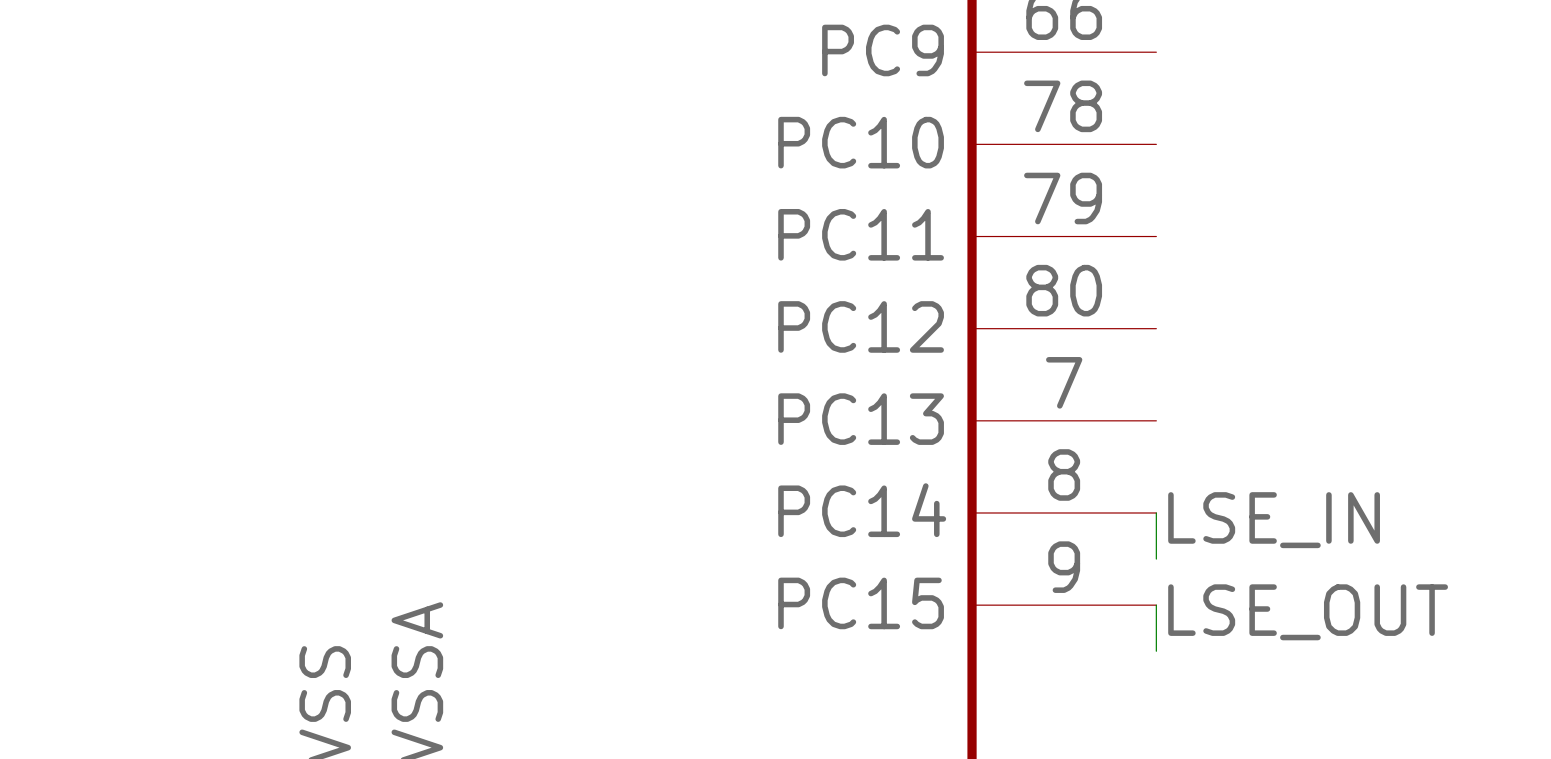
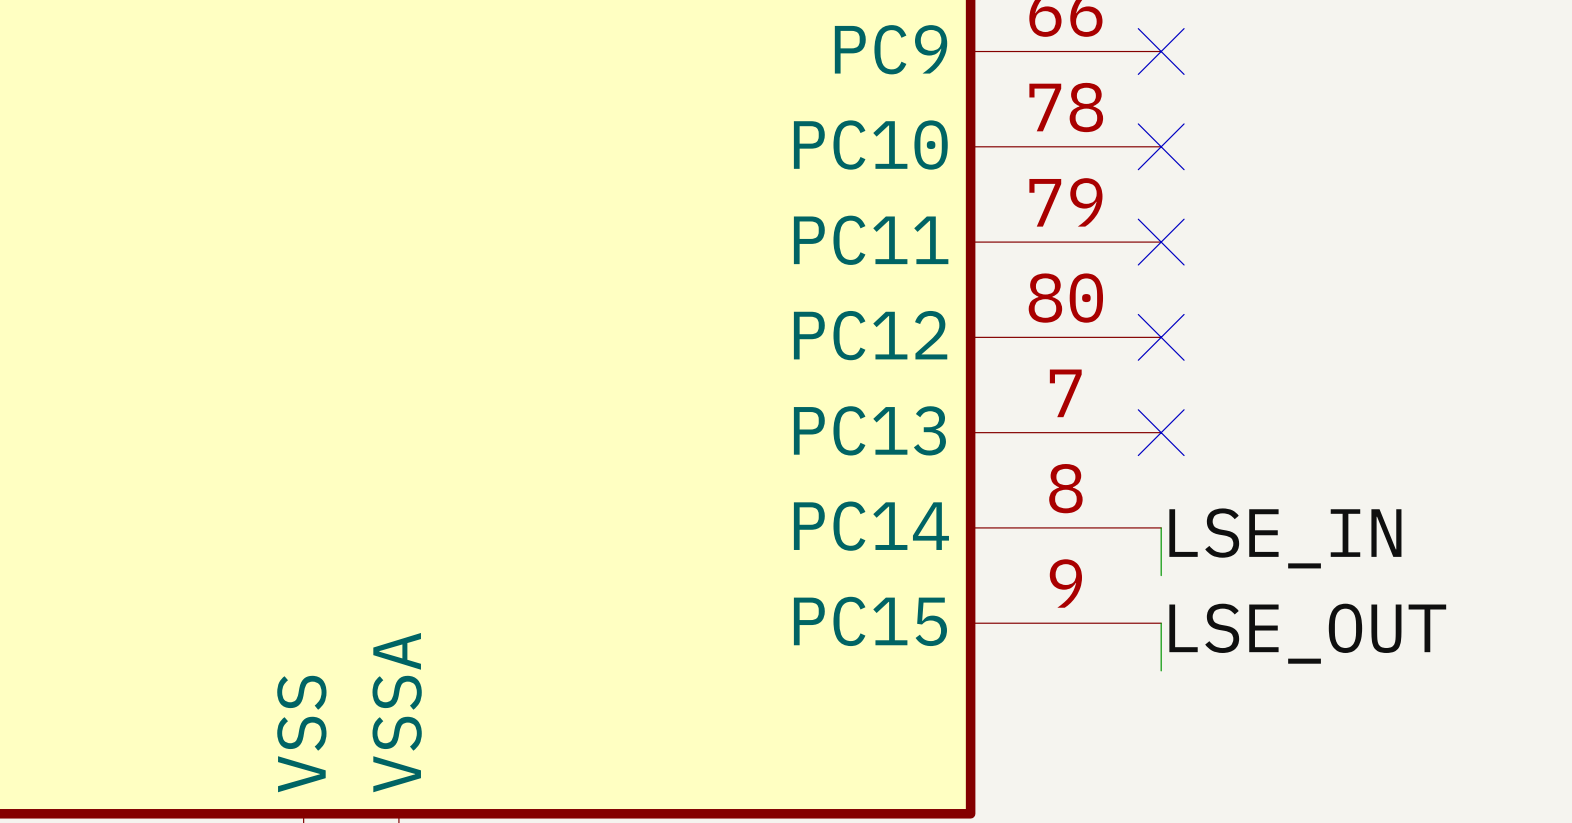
no-connect mark: none -> (1161, 51)
no-connect mark: none -> (1161, 146)
no-connect mark: none -> (1161, 242)
no-connect mark: none -> (1161, 337)
no-connect mark: none -> (1161, 432)

